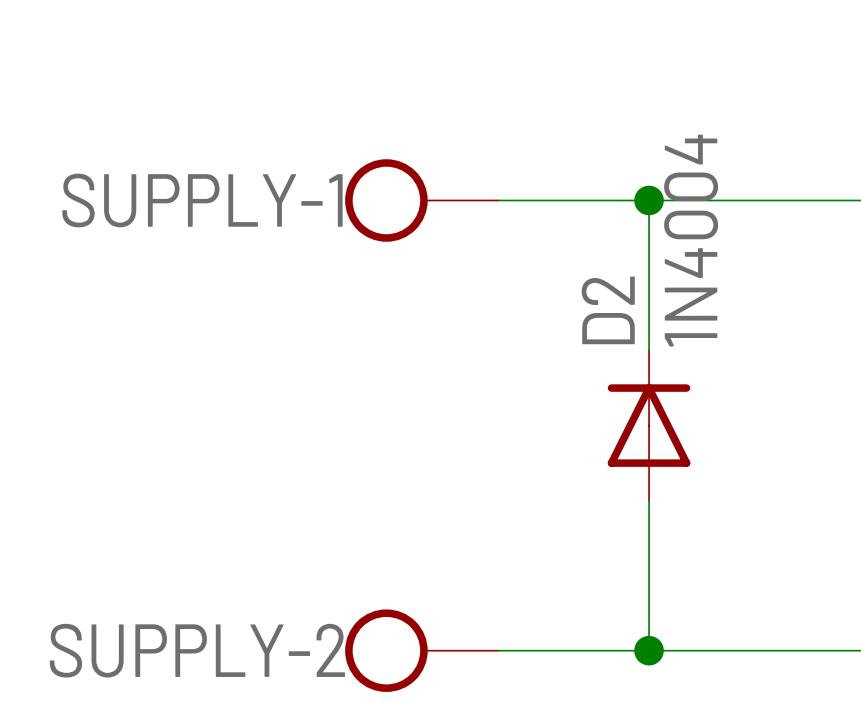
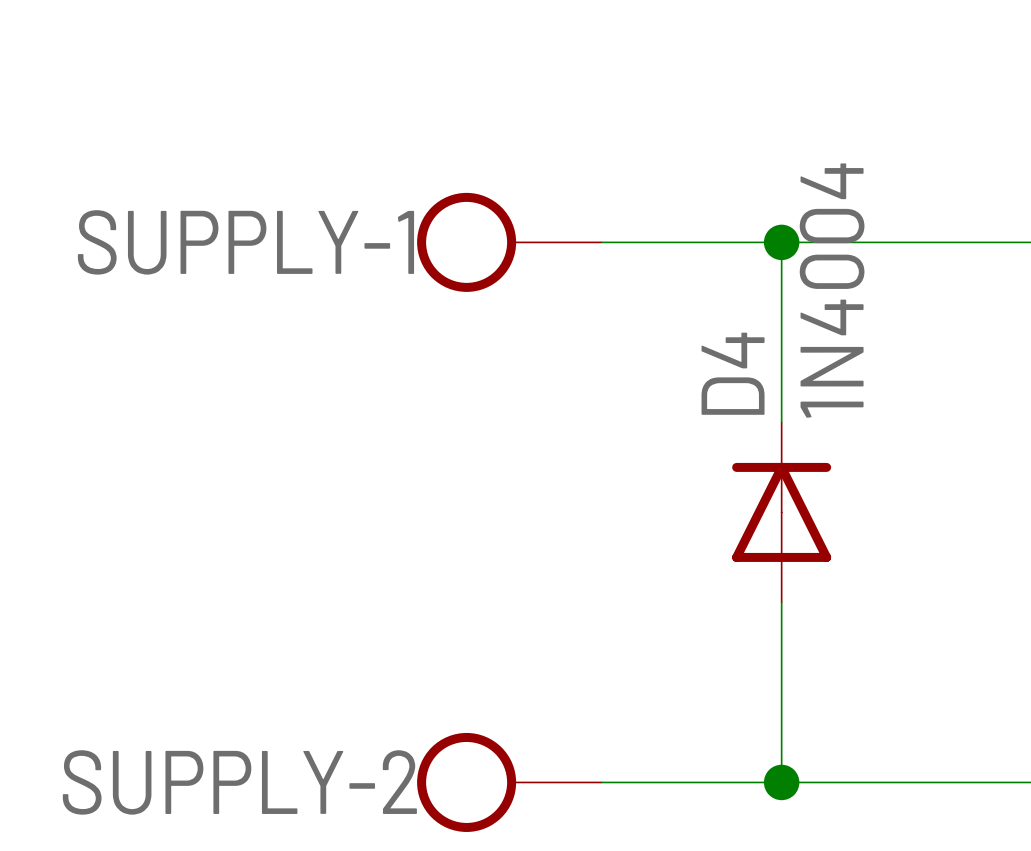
D2 name: D2 (608, 310) -> D4 (733, 373)

